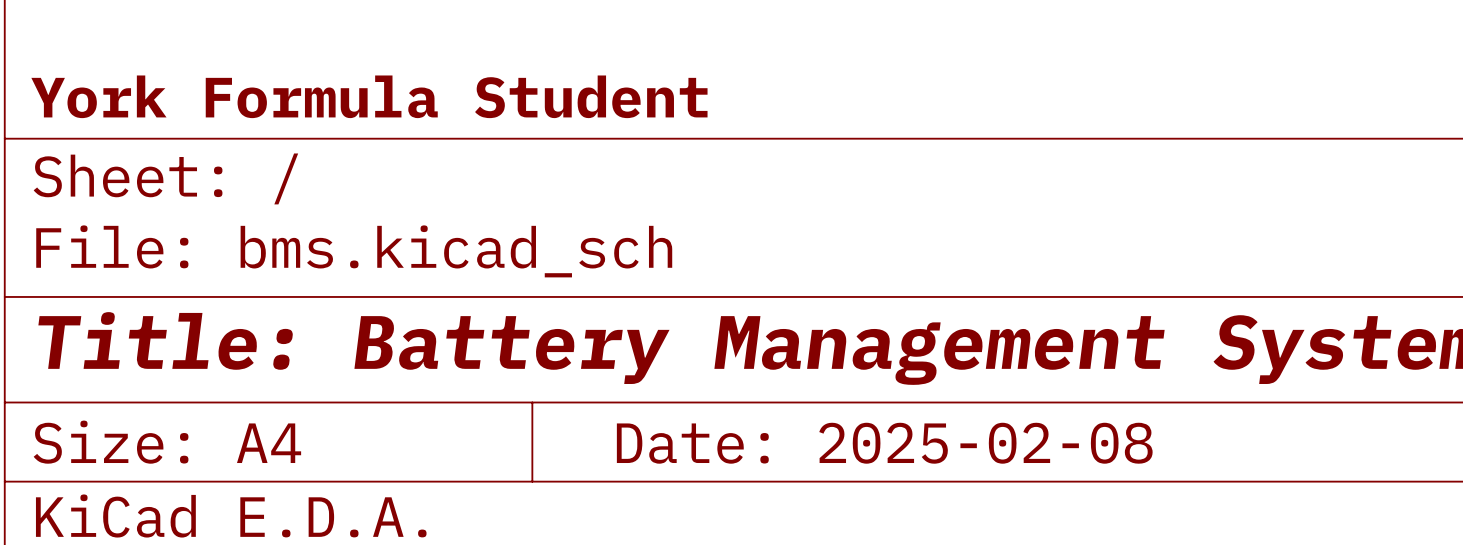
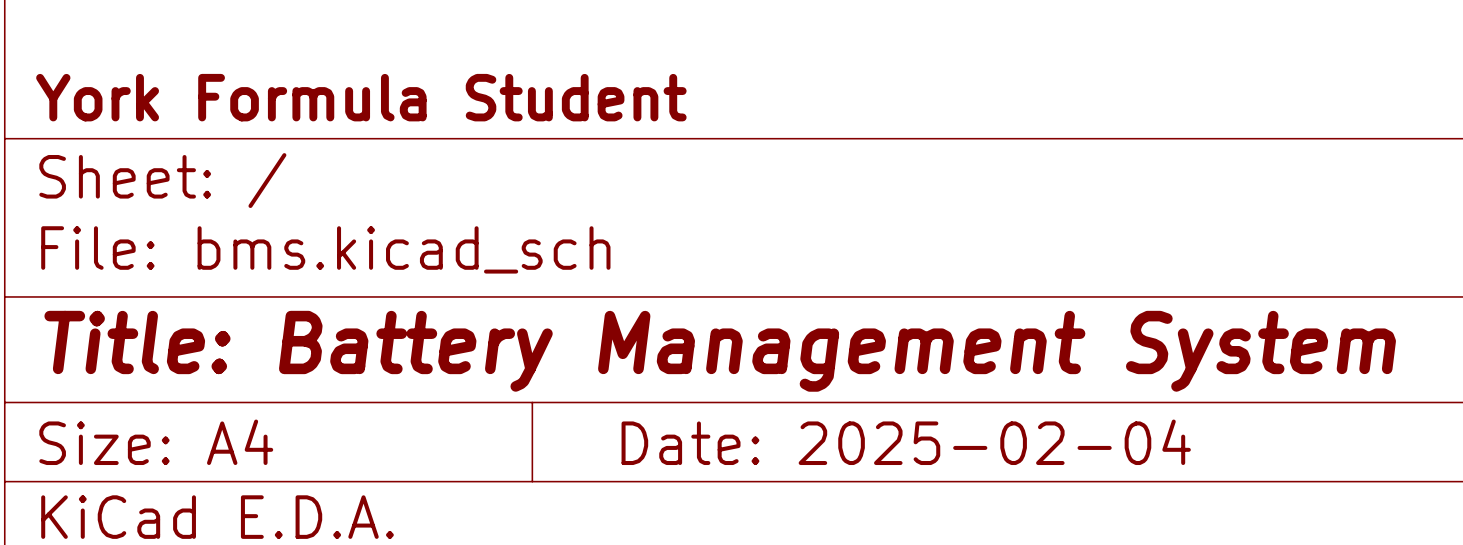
title block: Date: 2025-02-08 (884, 443) -> Date: 2025-02-04 (906, 442)

